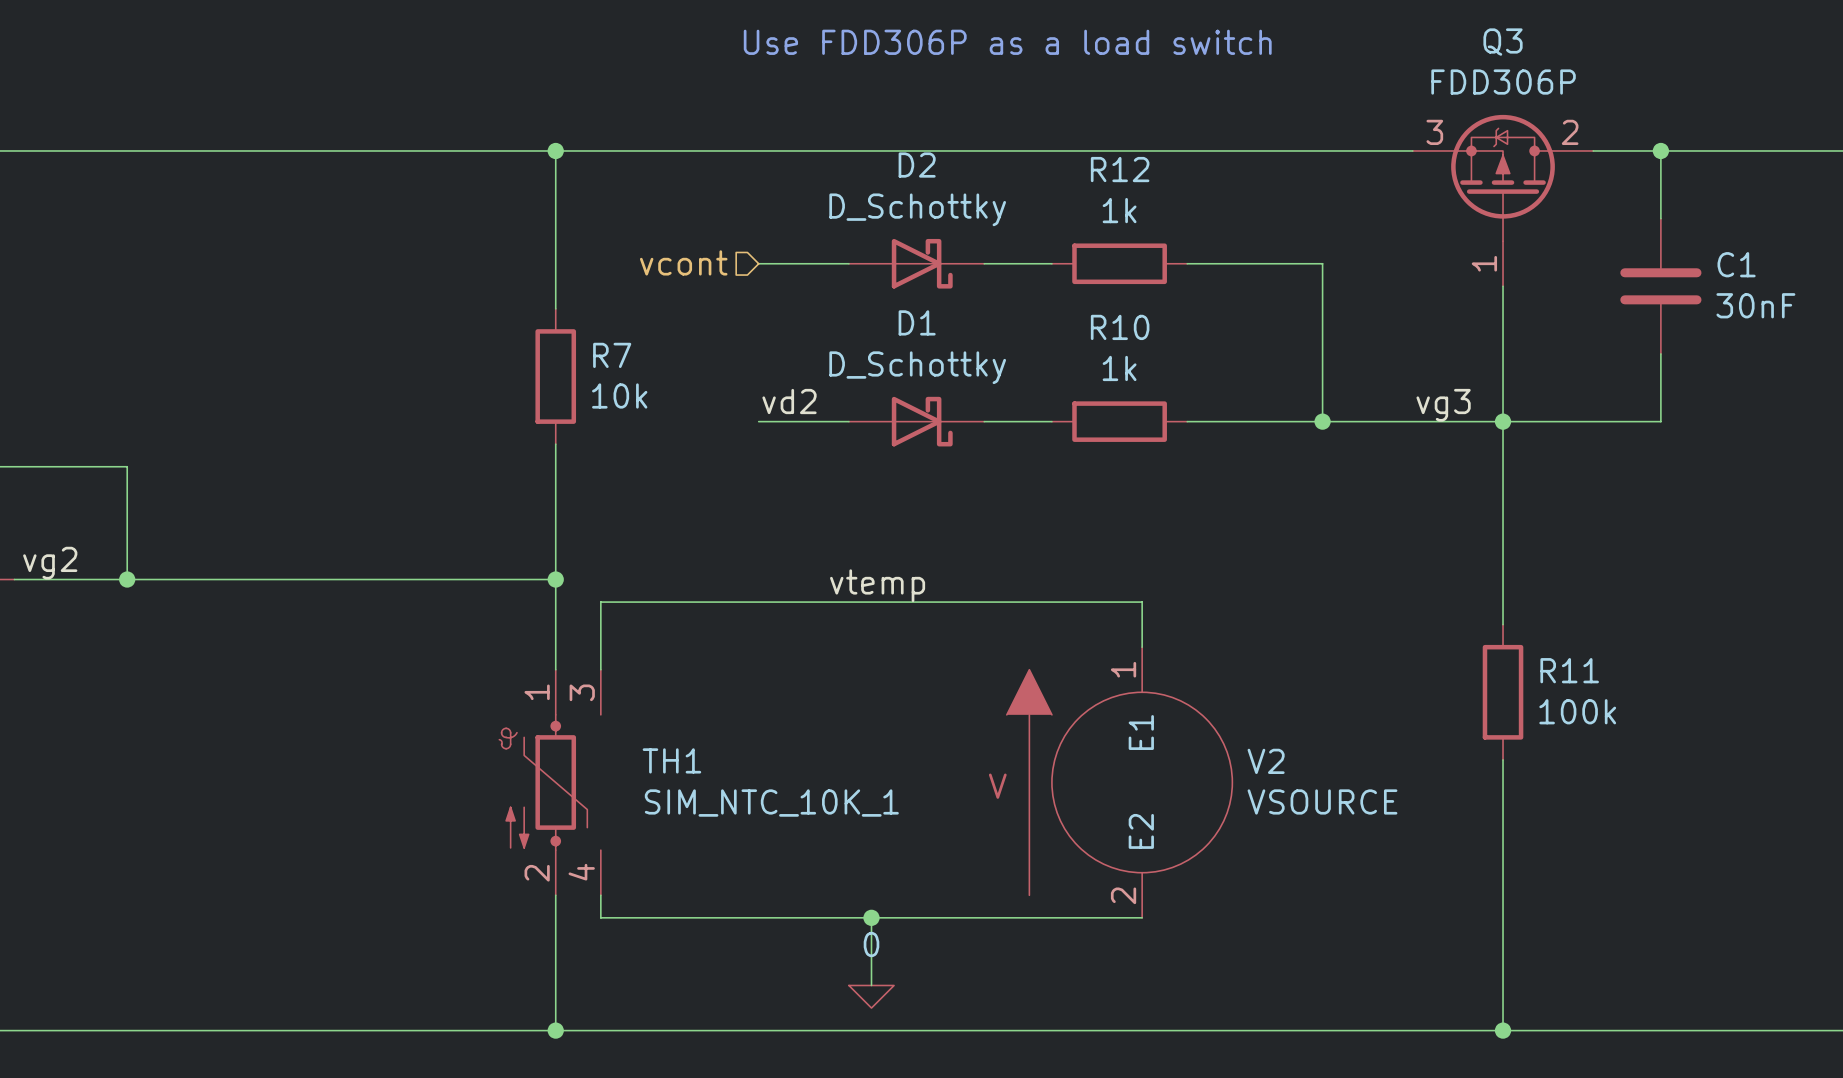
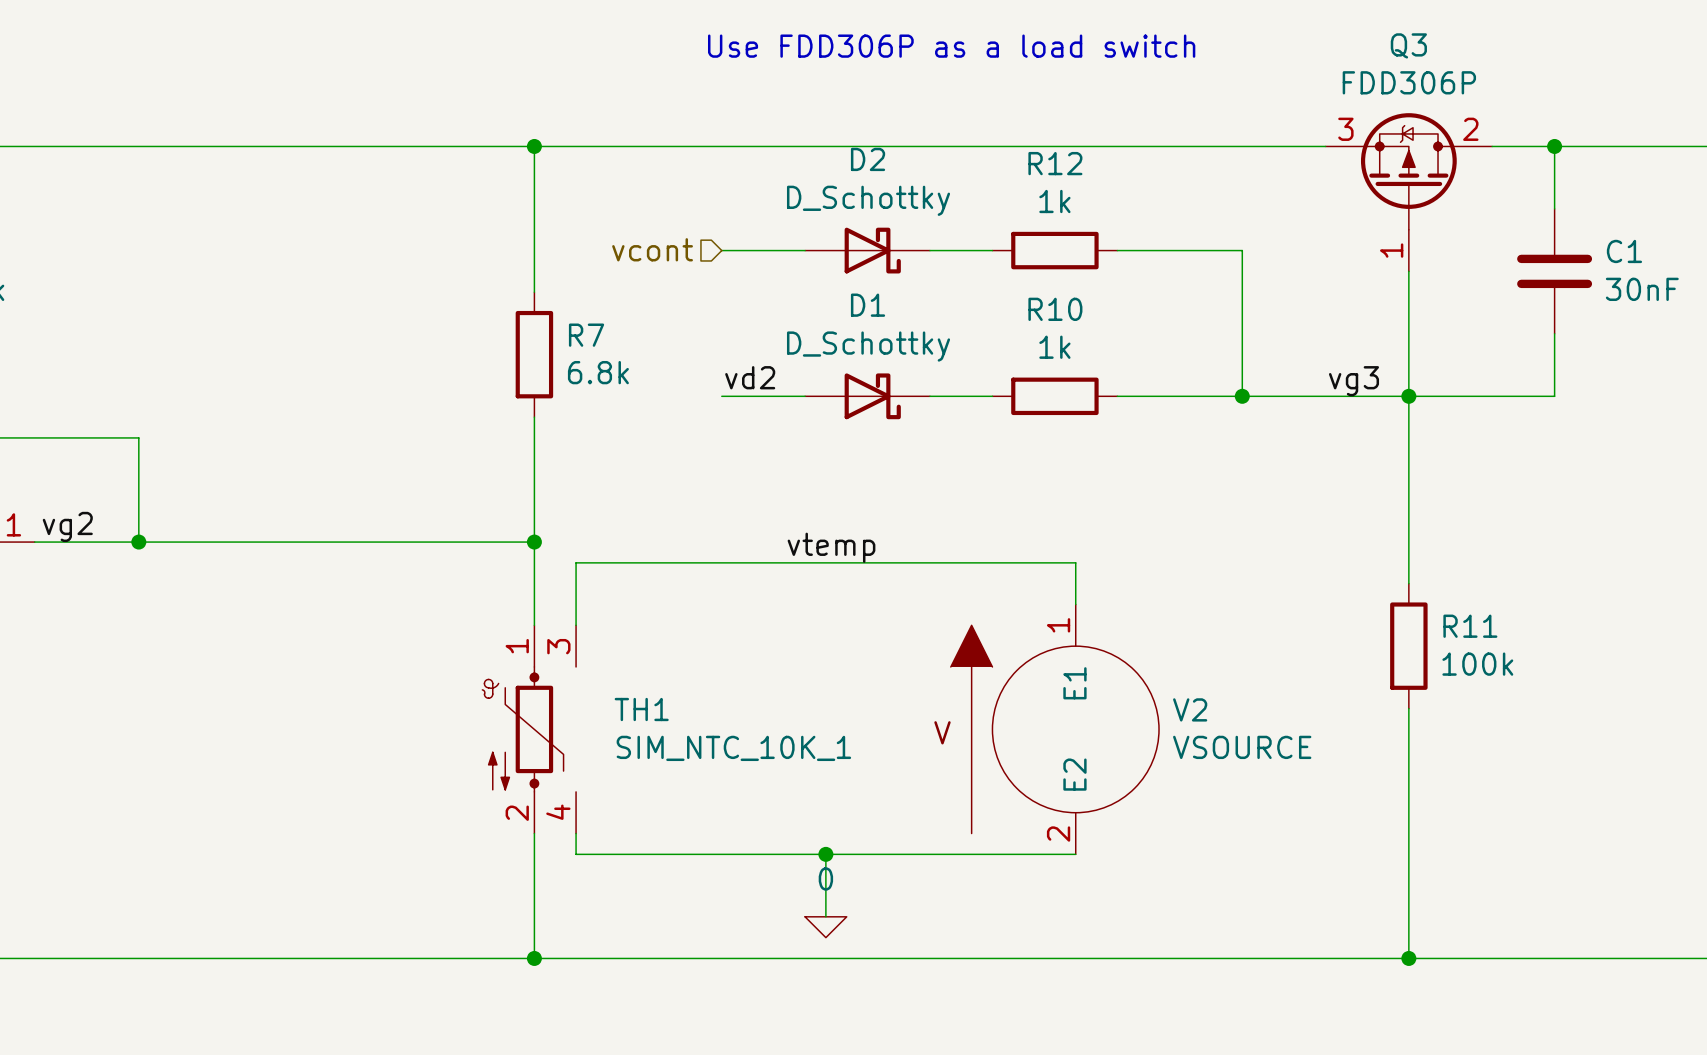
R7 value: 10k (619, 395) -> 6.8k (598, 372)

